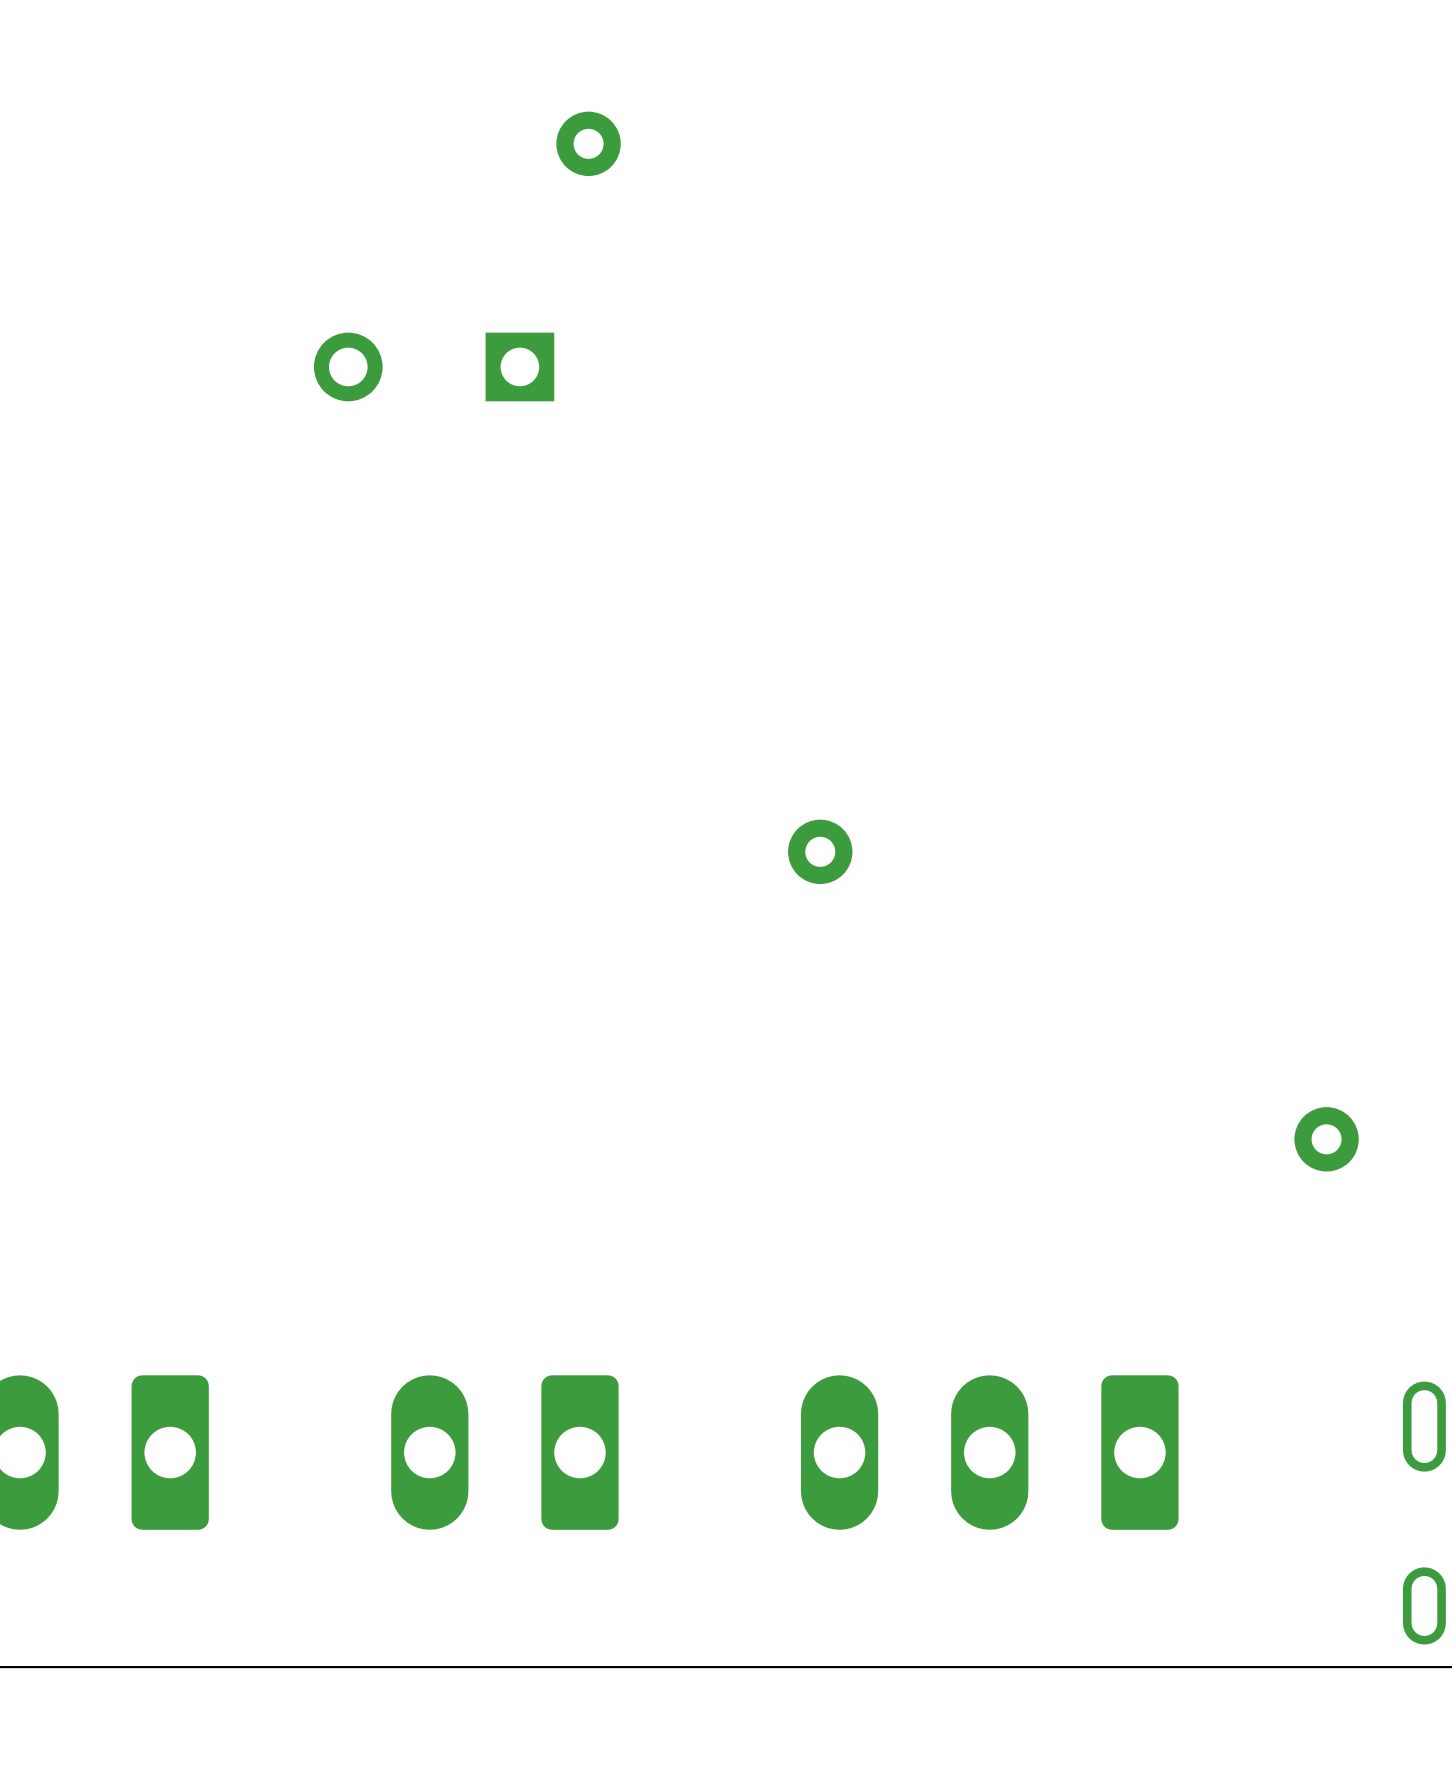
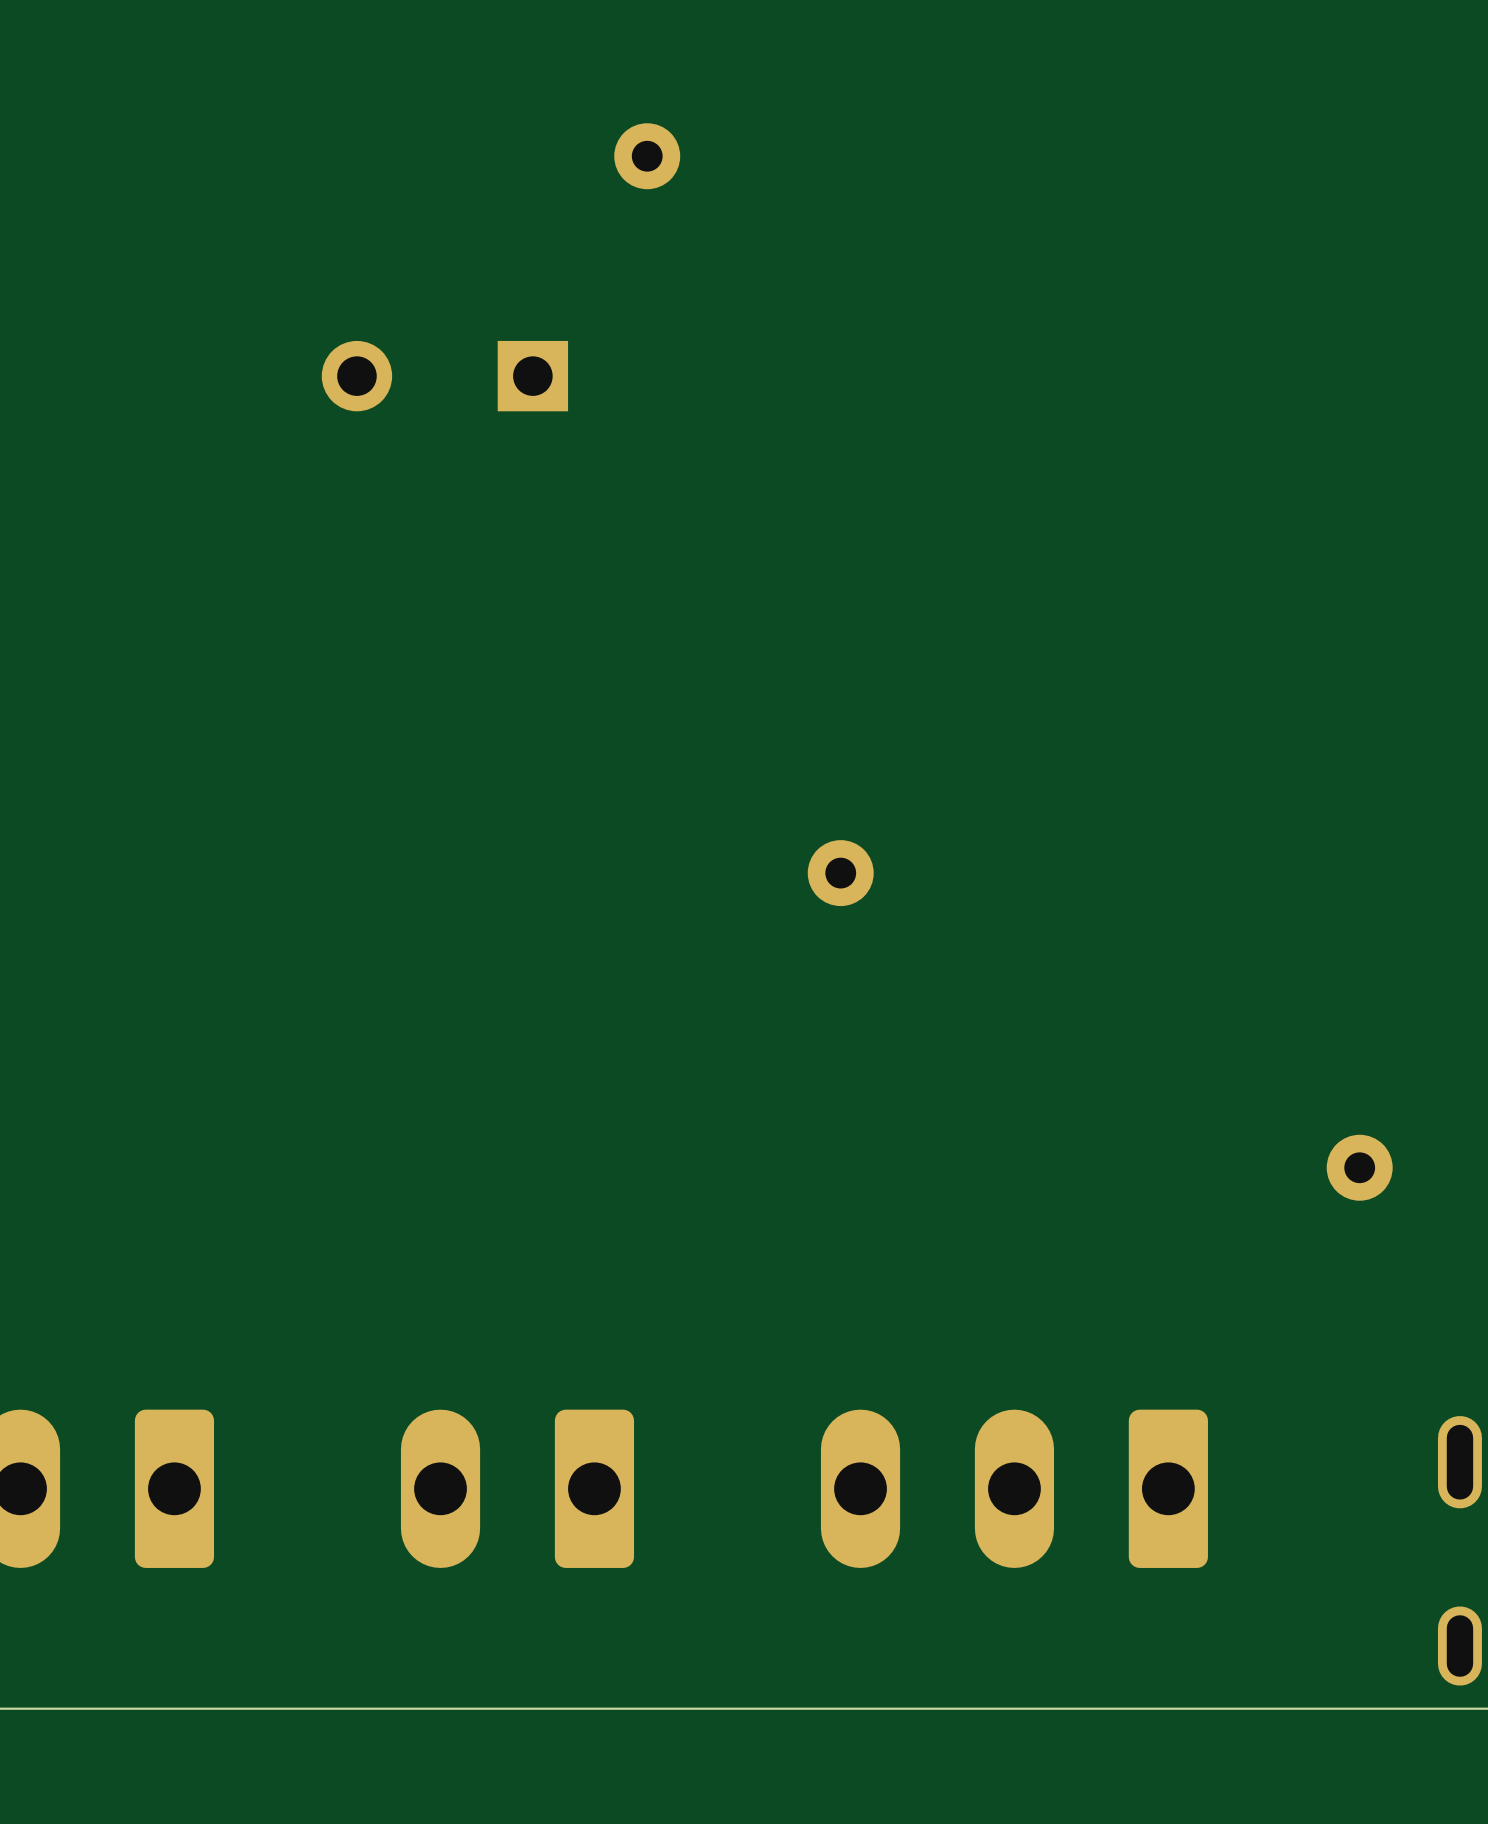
part position: (588, 143) -> (647, 156)

